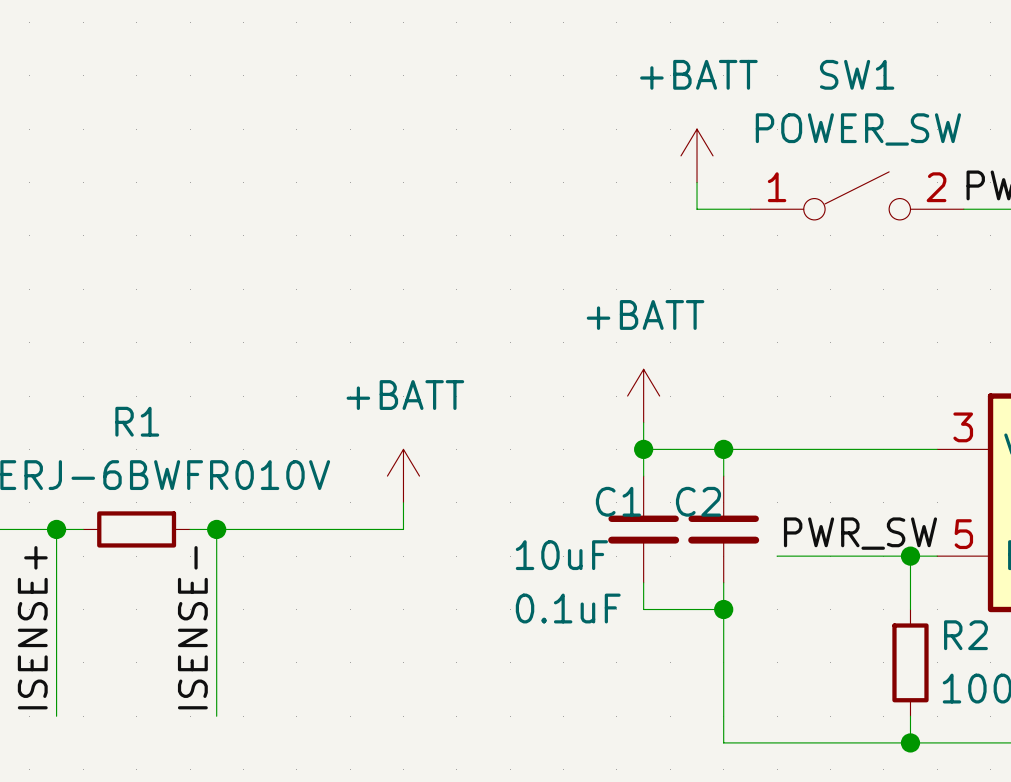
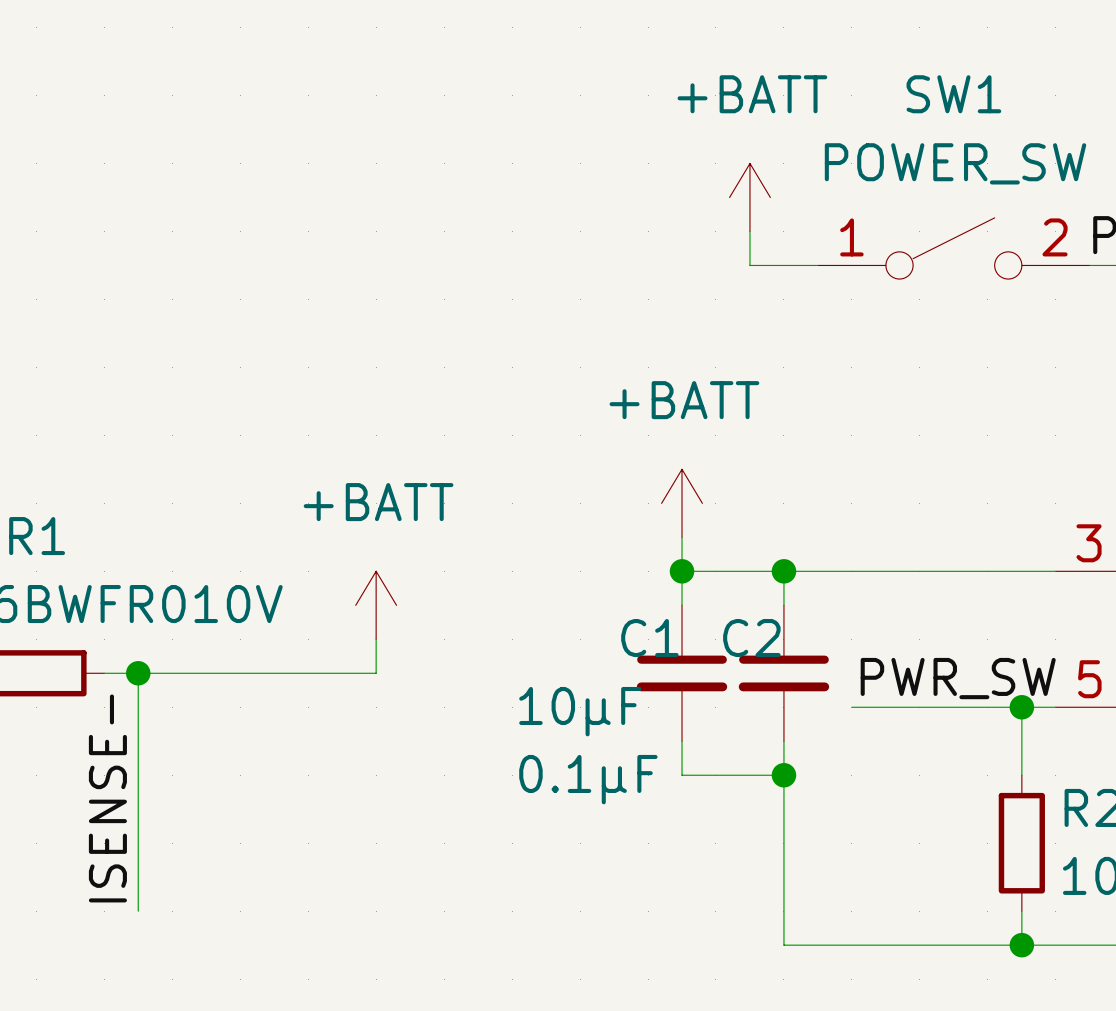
C1 value: 10uF (561, 555) -> 10µF (580, 711)
C2 value: 0.1uF (568, 608) -> 0.1µF (588, 779)

